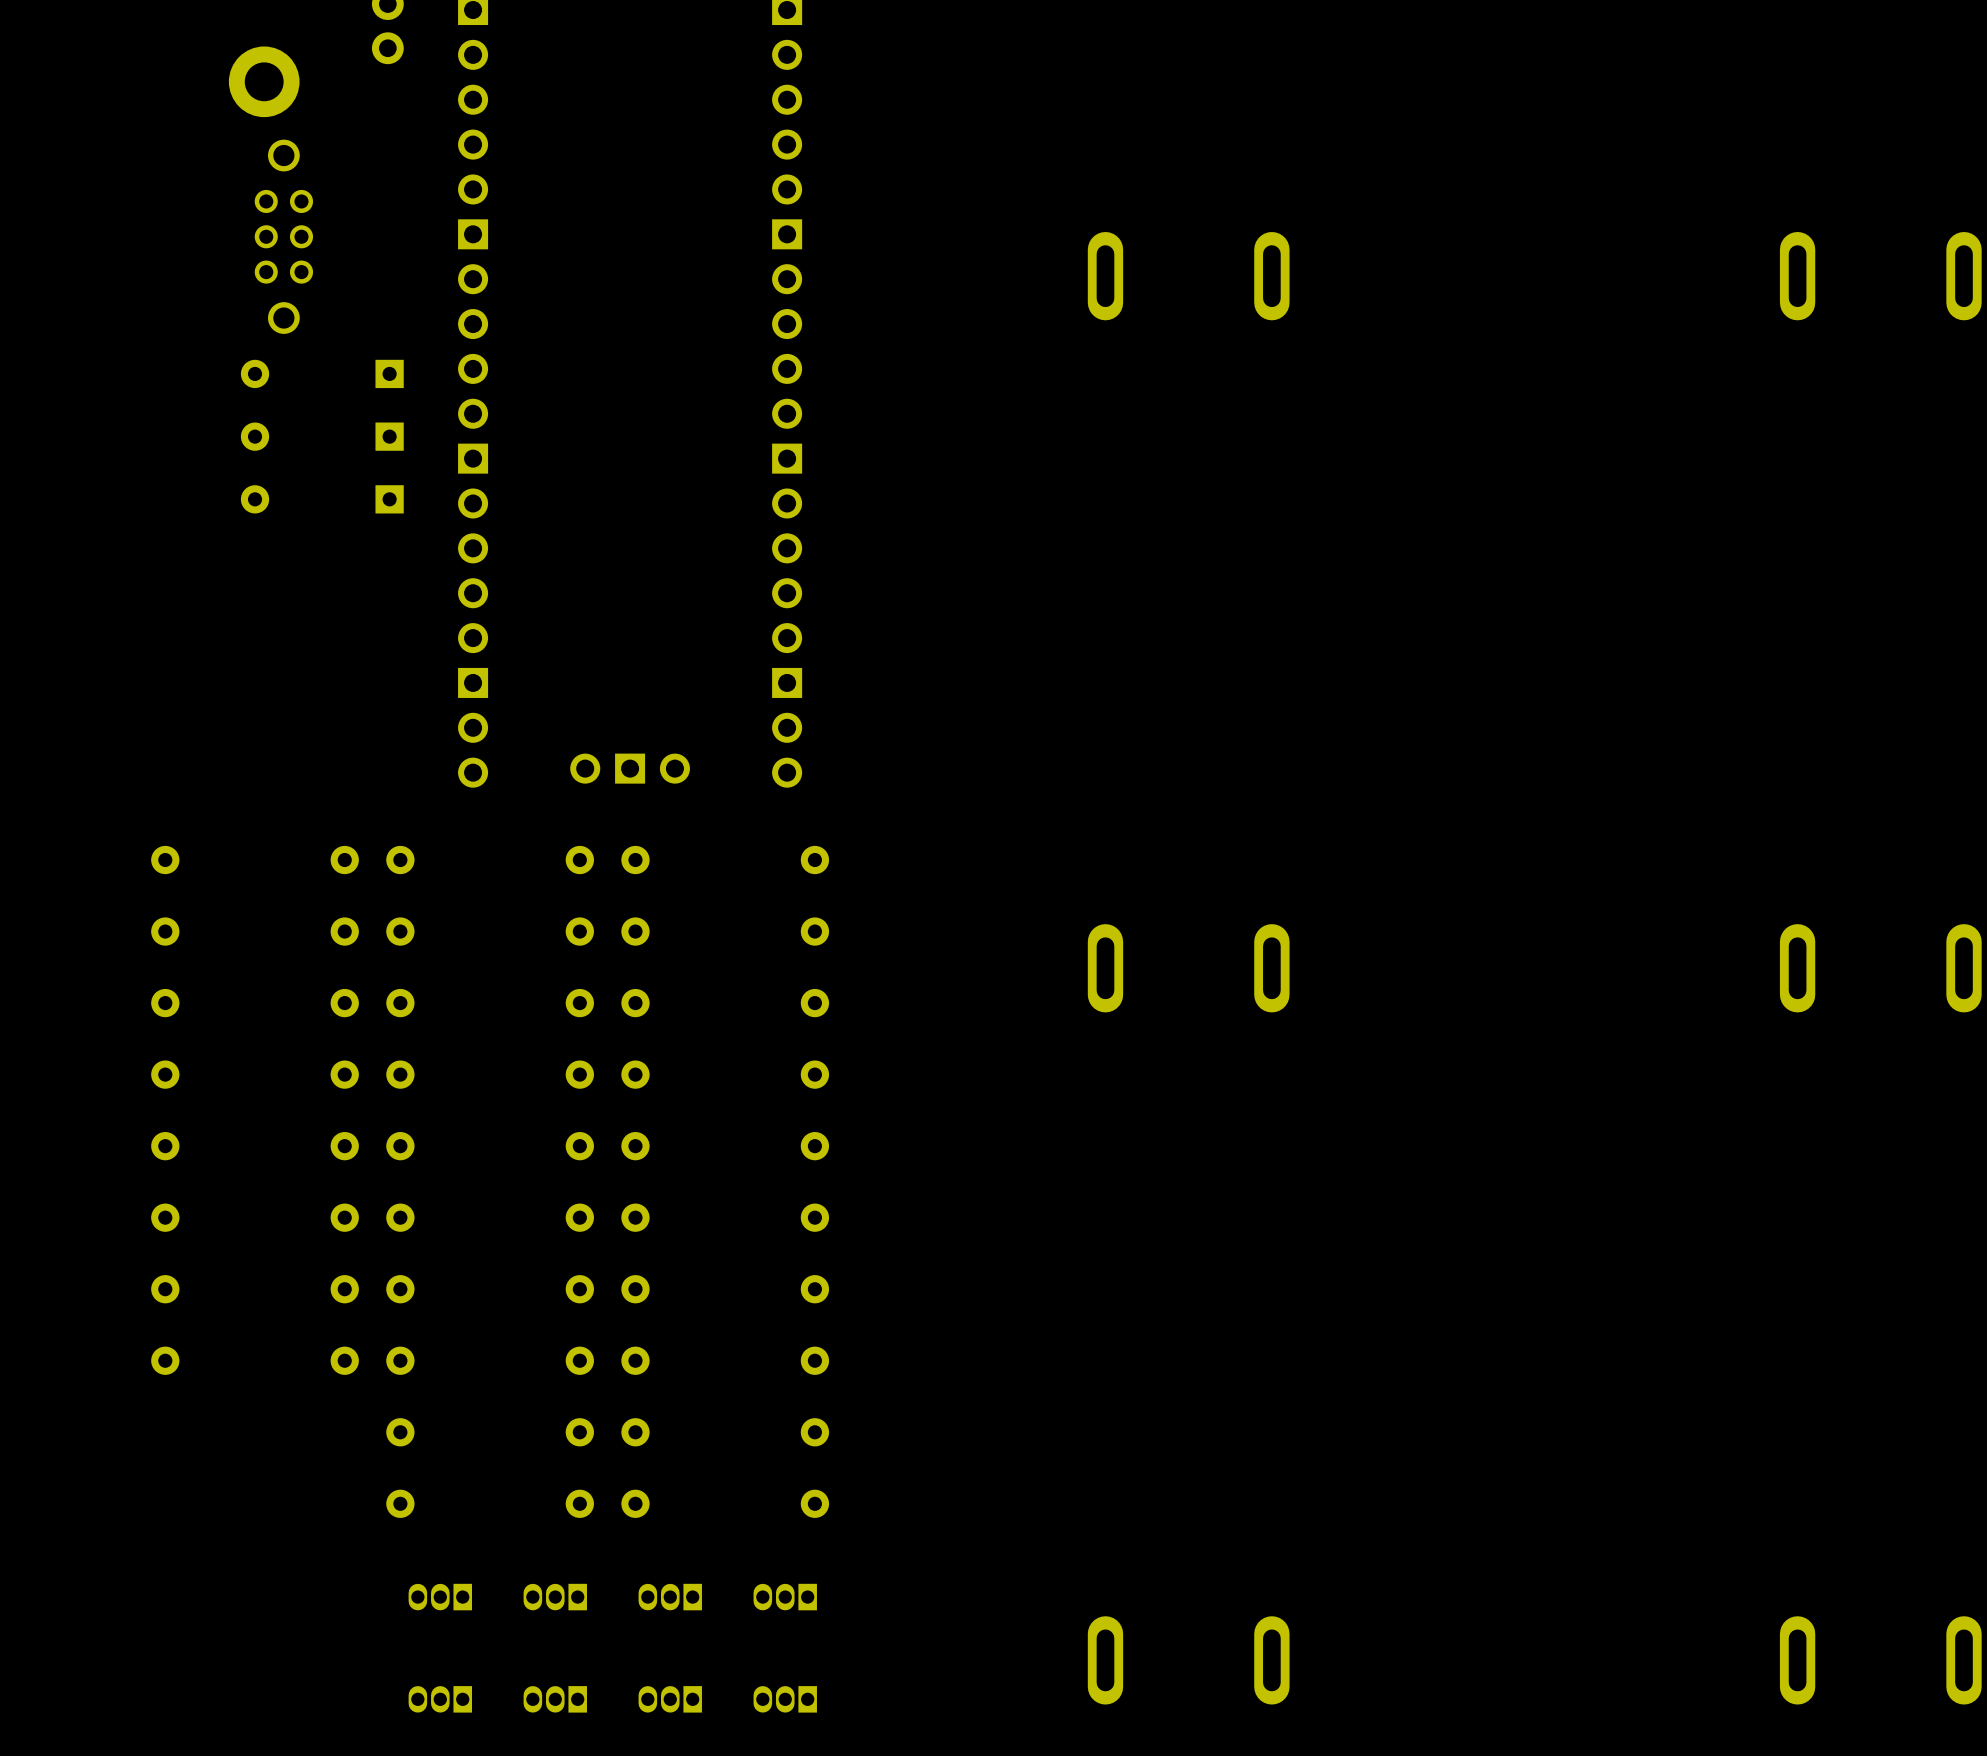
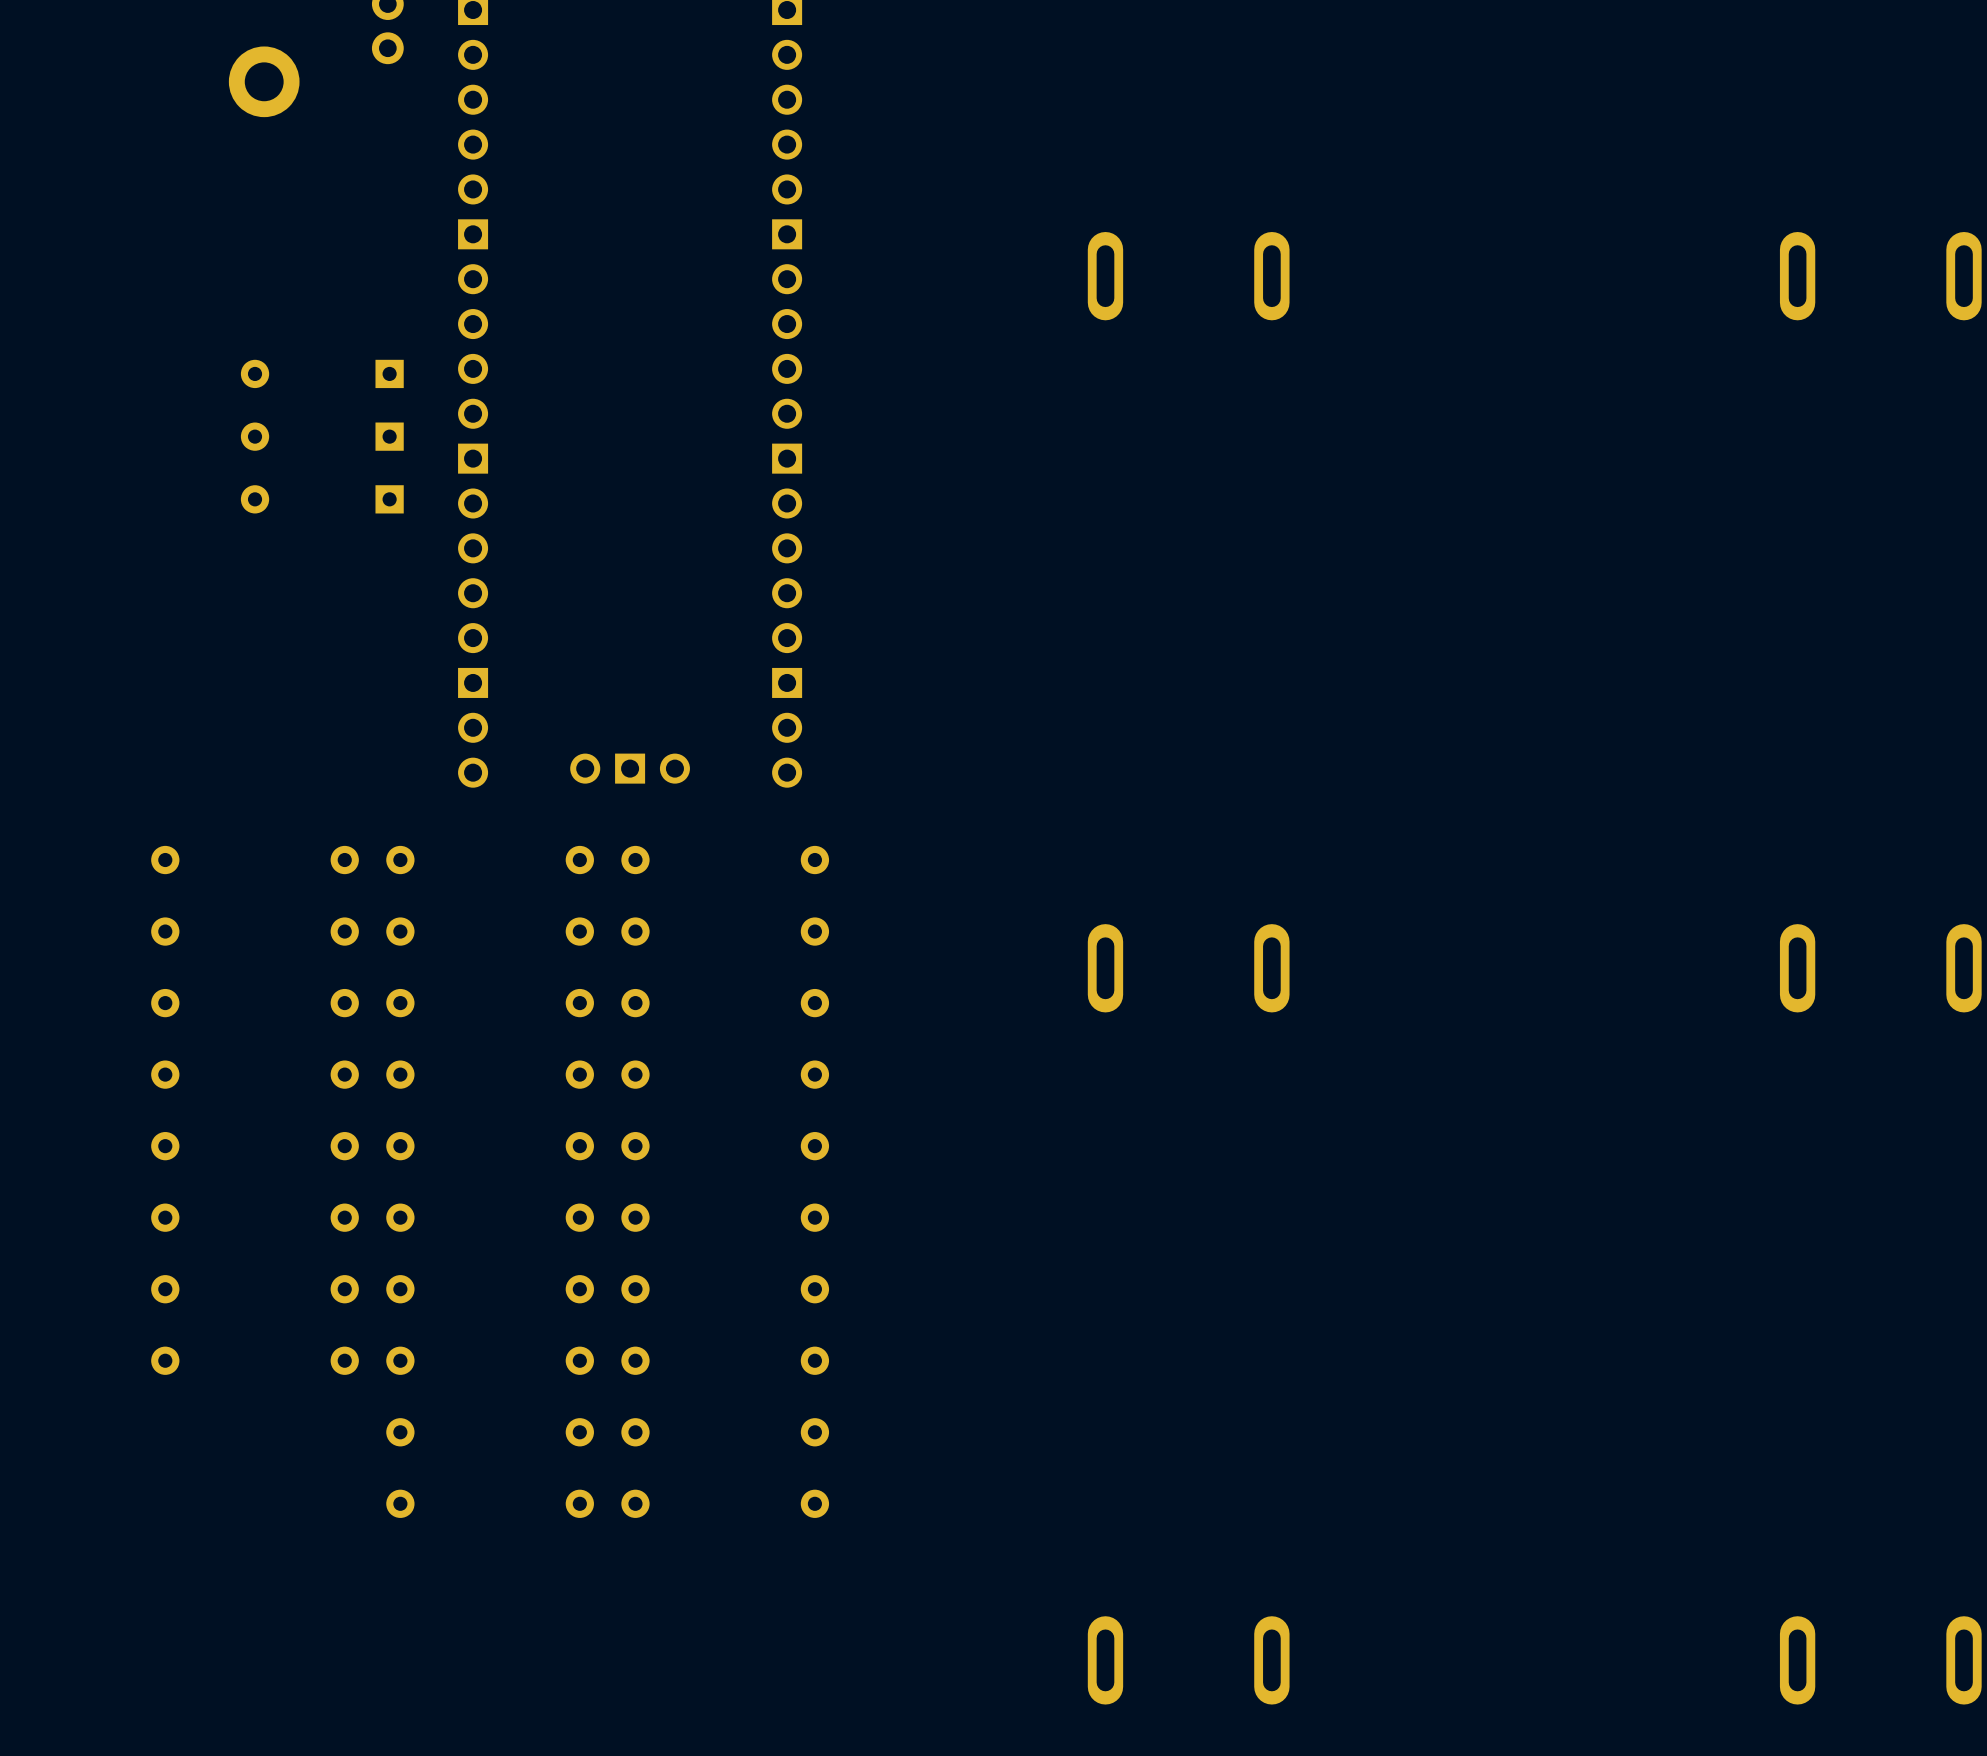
part: (283, 236) -> none
part: (440, 1597) -> none
part: (555, 1597) -> none
part: (670, 1597) -> none
part: (785, 1597) -> none
part: (440, 1699) -> none
part: (555, 1699) -> none
part: (670, 1699) -> none
part: (785, 1699) -> none

